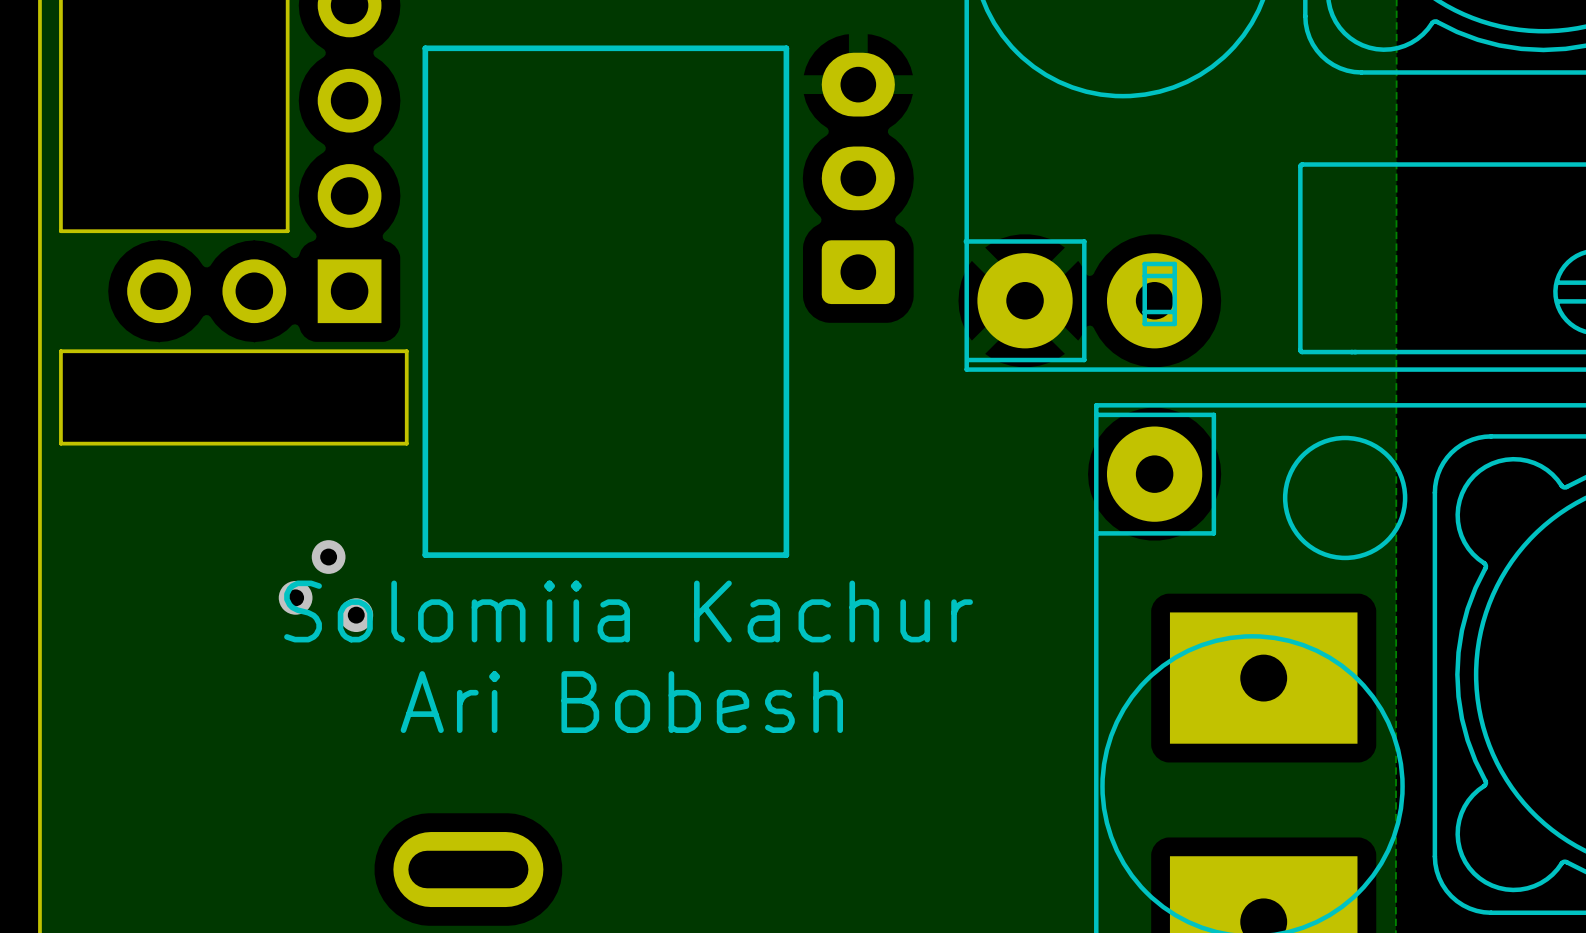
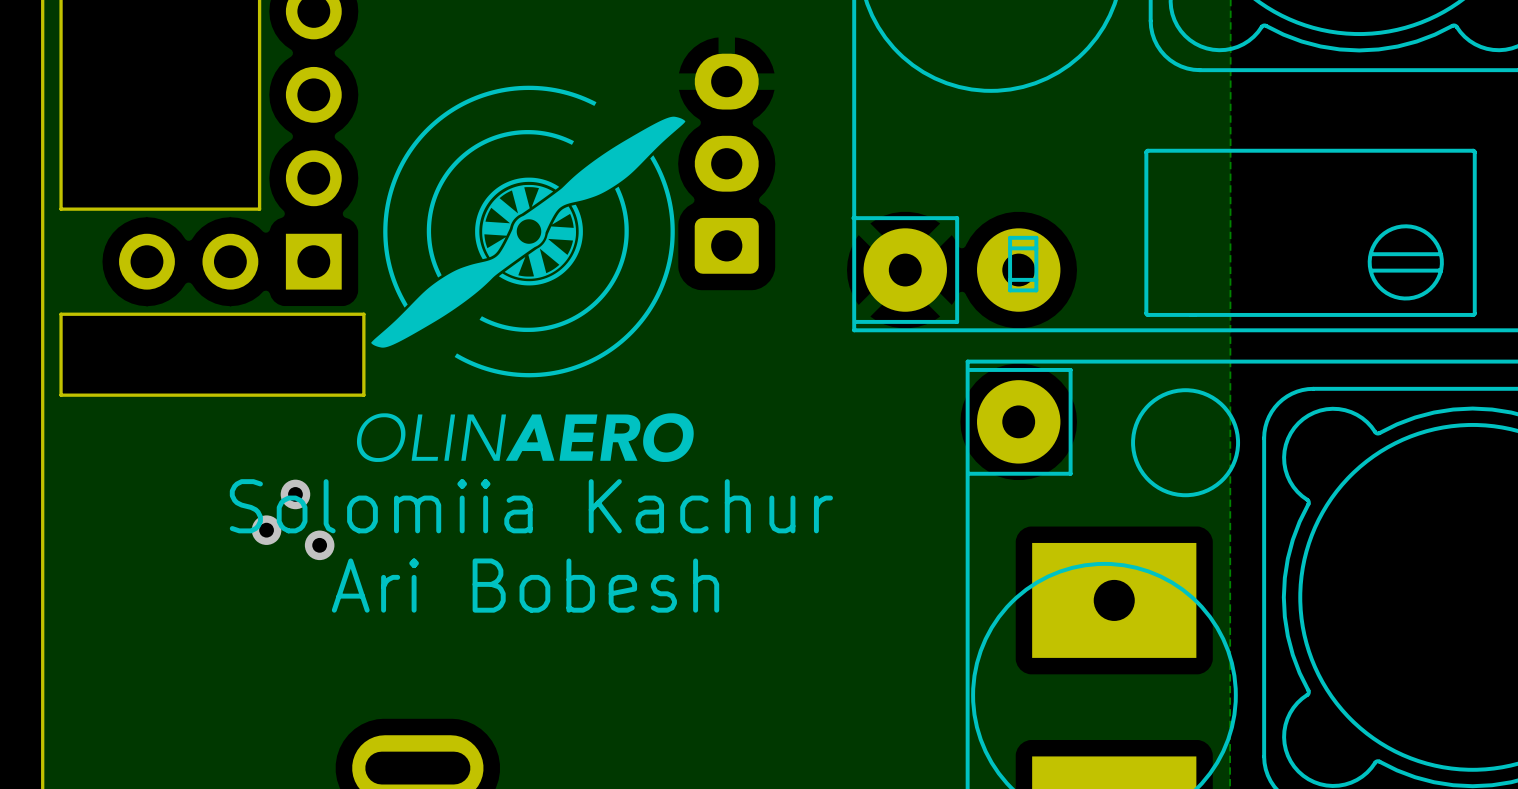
line: (786, 48) (425, 48) (425, 555) (786, 555) (786, 48) -> none
drawing: none -> [356, 85, 694, 462]
part position: (858, 178) -> (726, 163)
text position: Solomiia Kachur (628, 611) -> Solomiia Kachur (531, 506)
text position: Ari Bobesh (621, 702) -> Ari Bobesh (525, 585)

